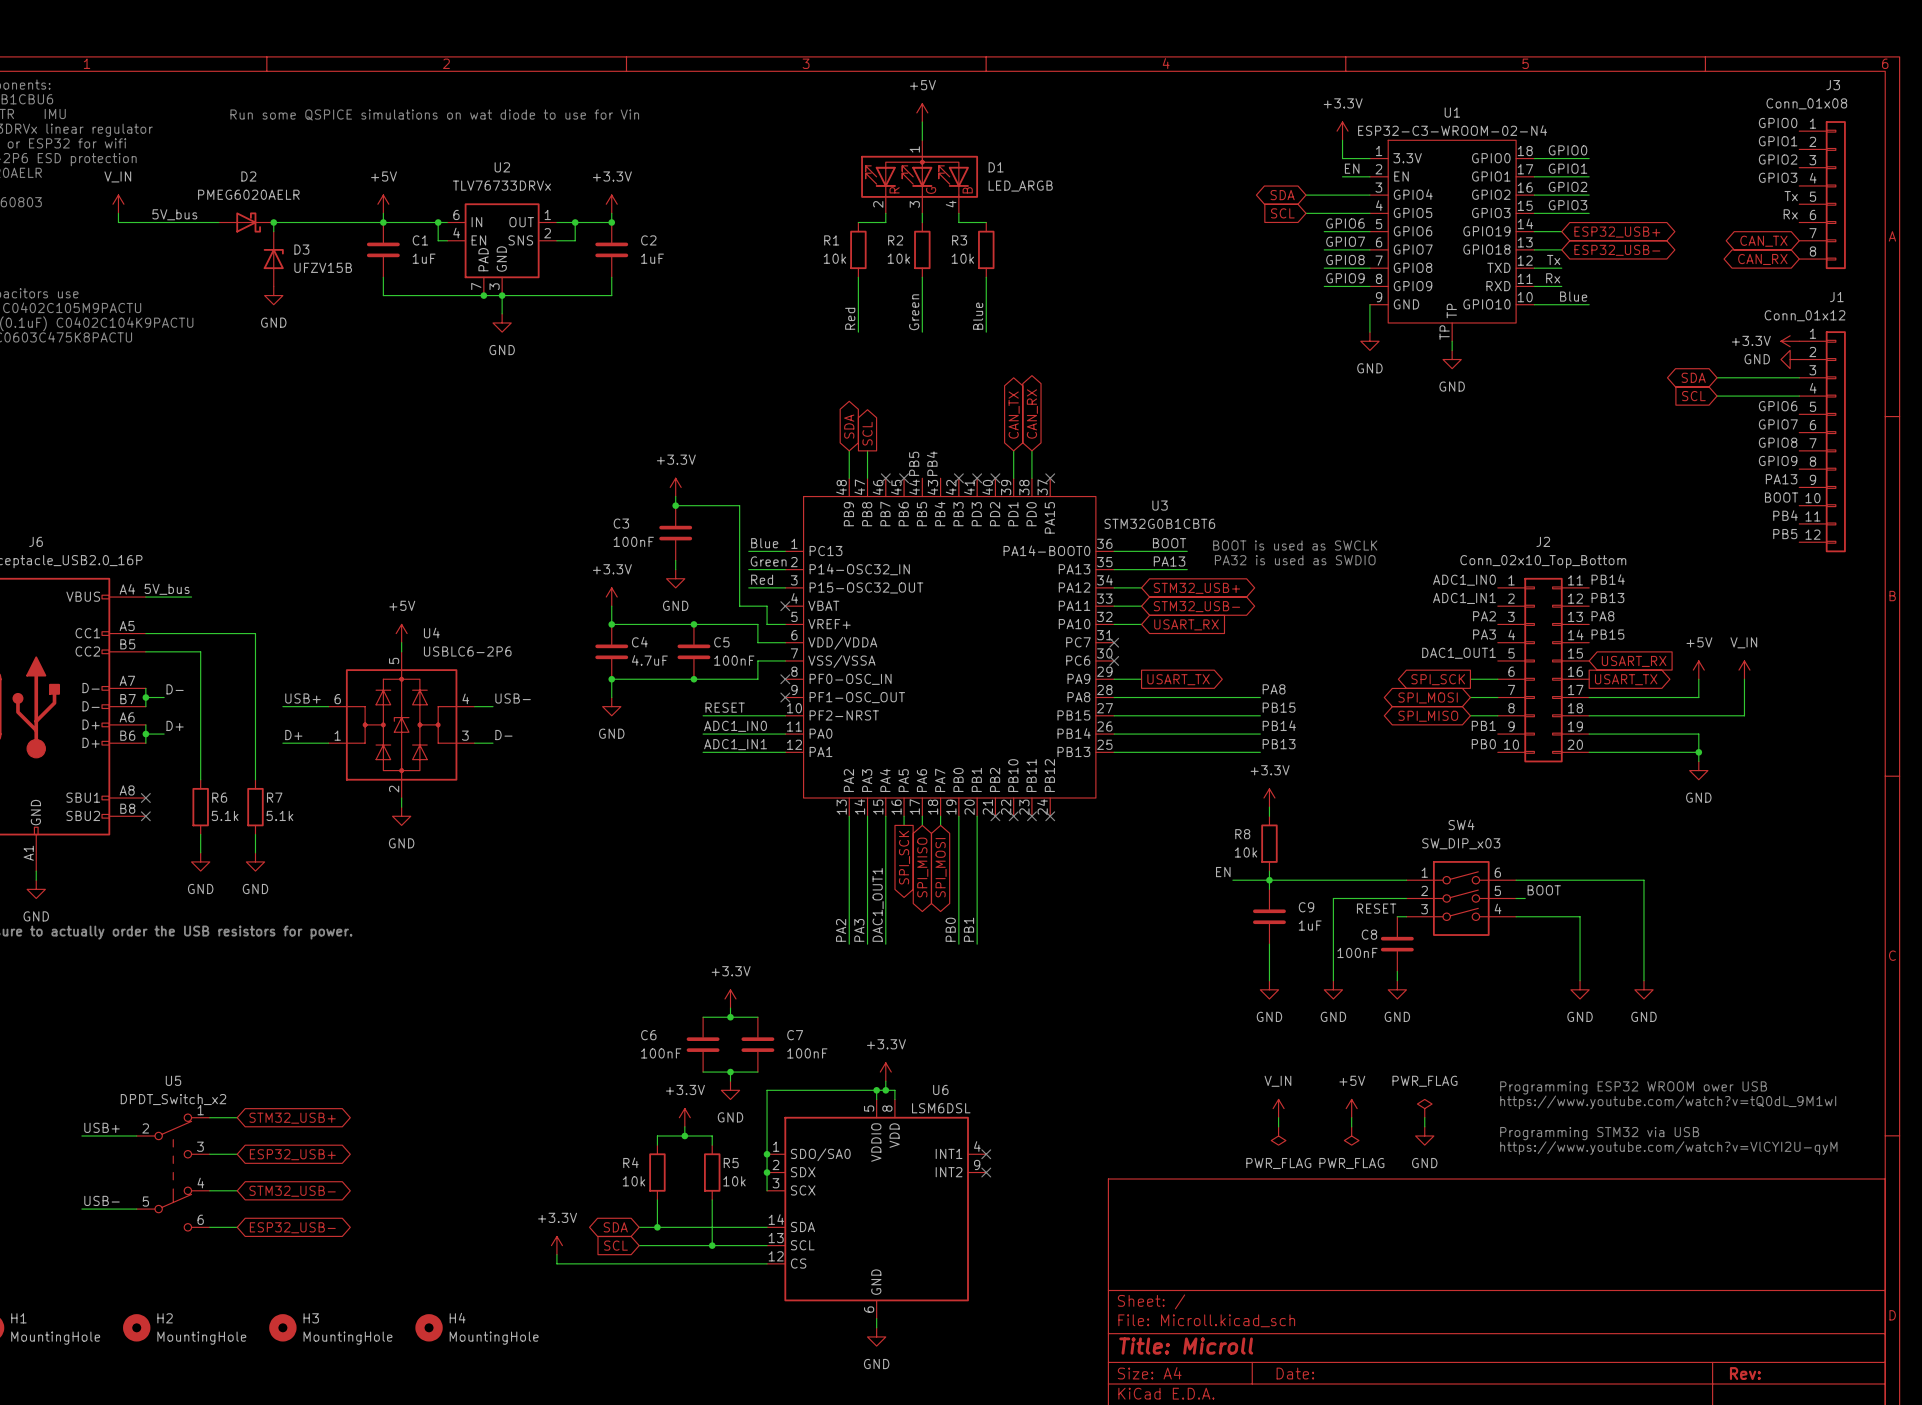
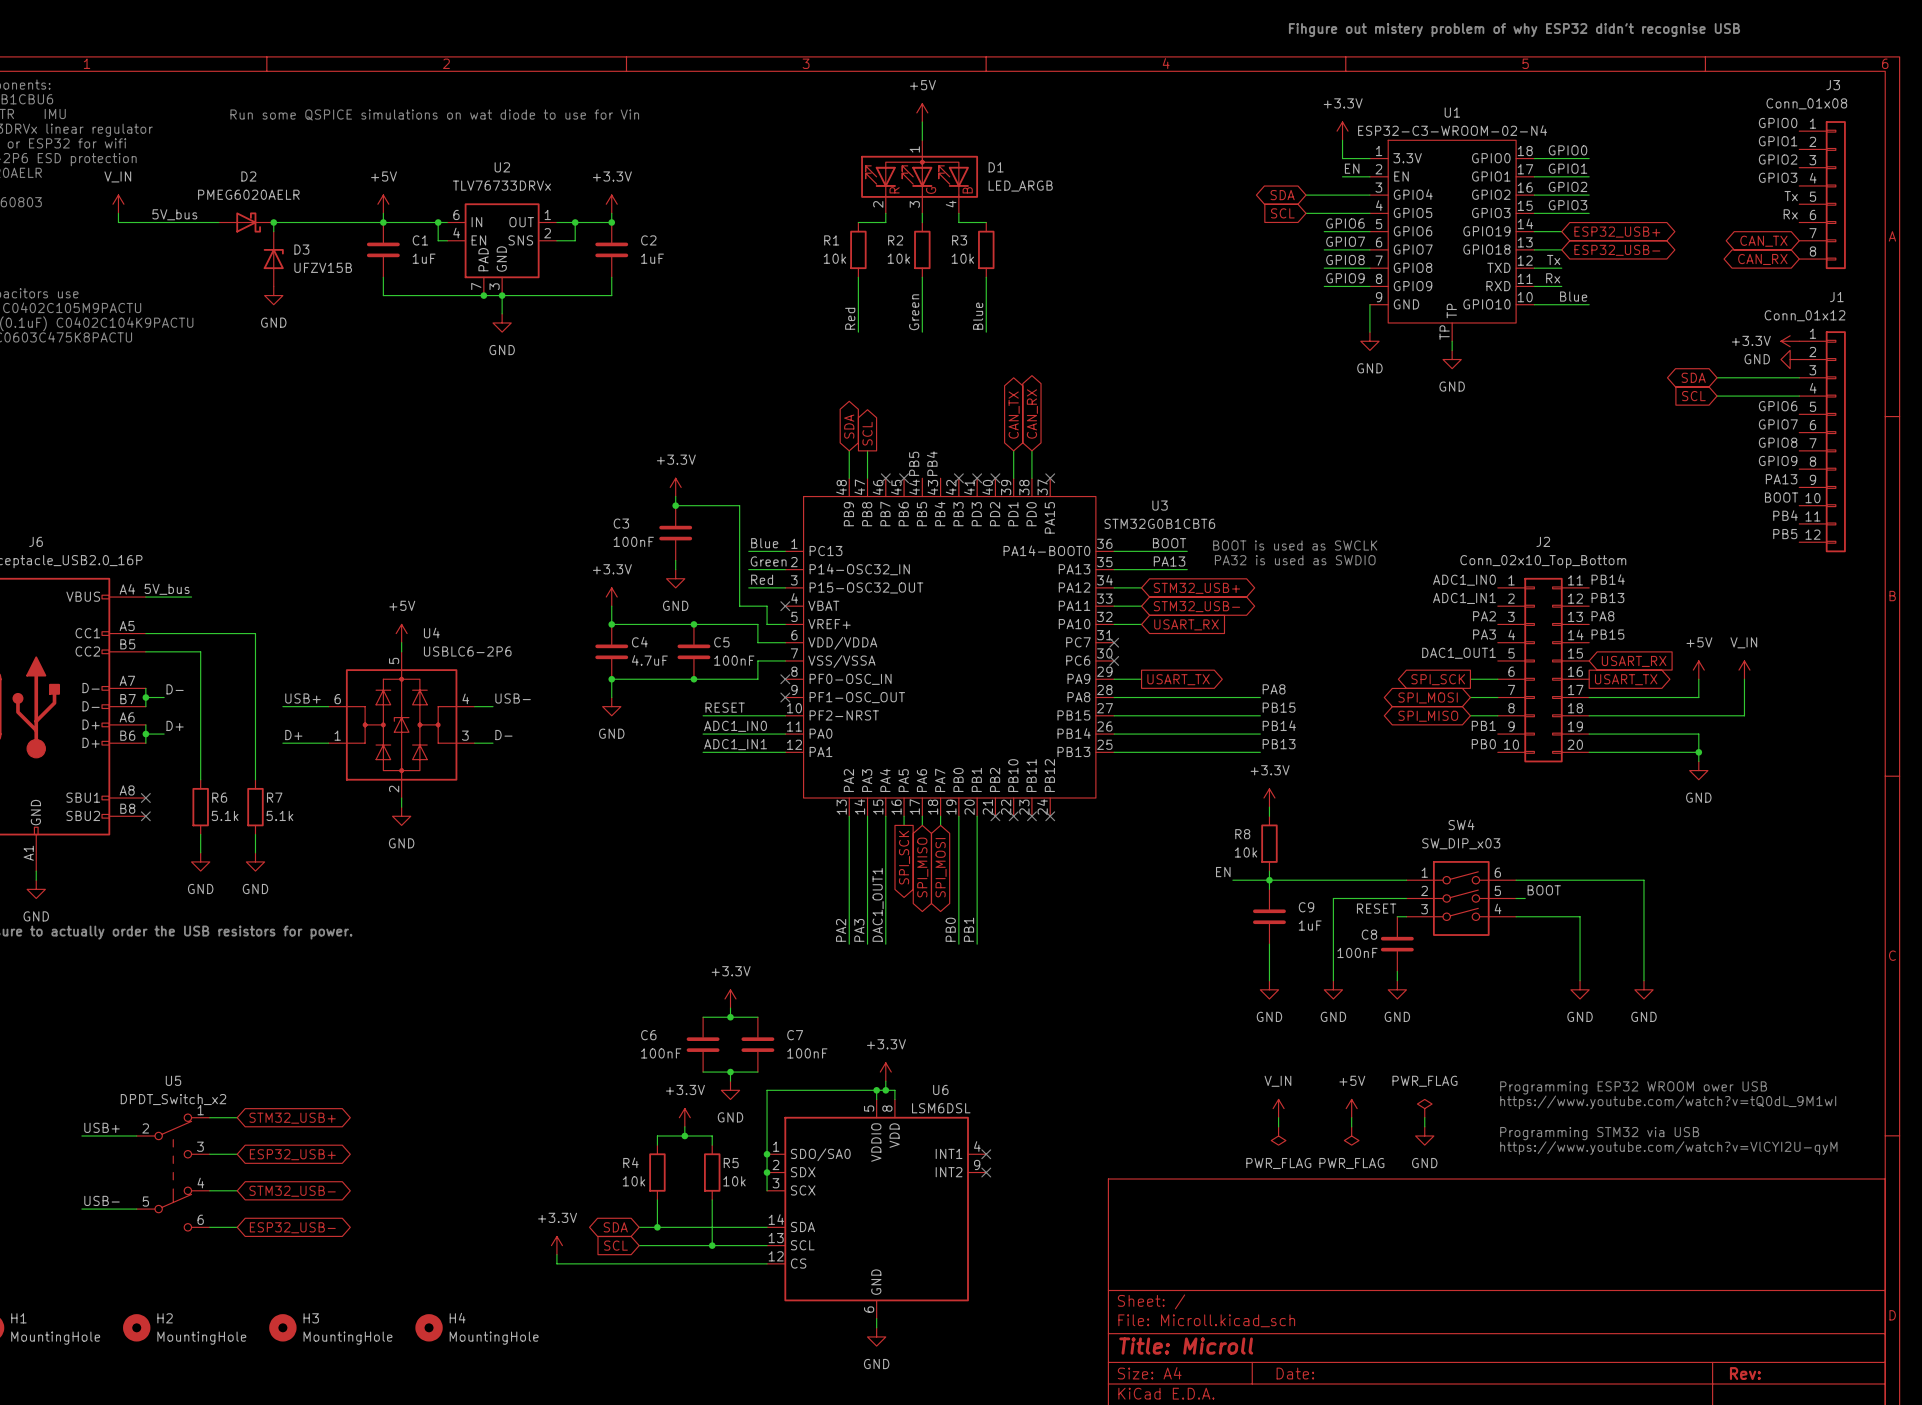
text: none -> Fihgure out mistery problem of why ESP32 didn't recognise USB (1514, 30)

